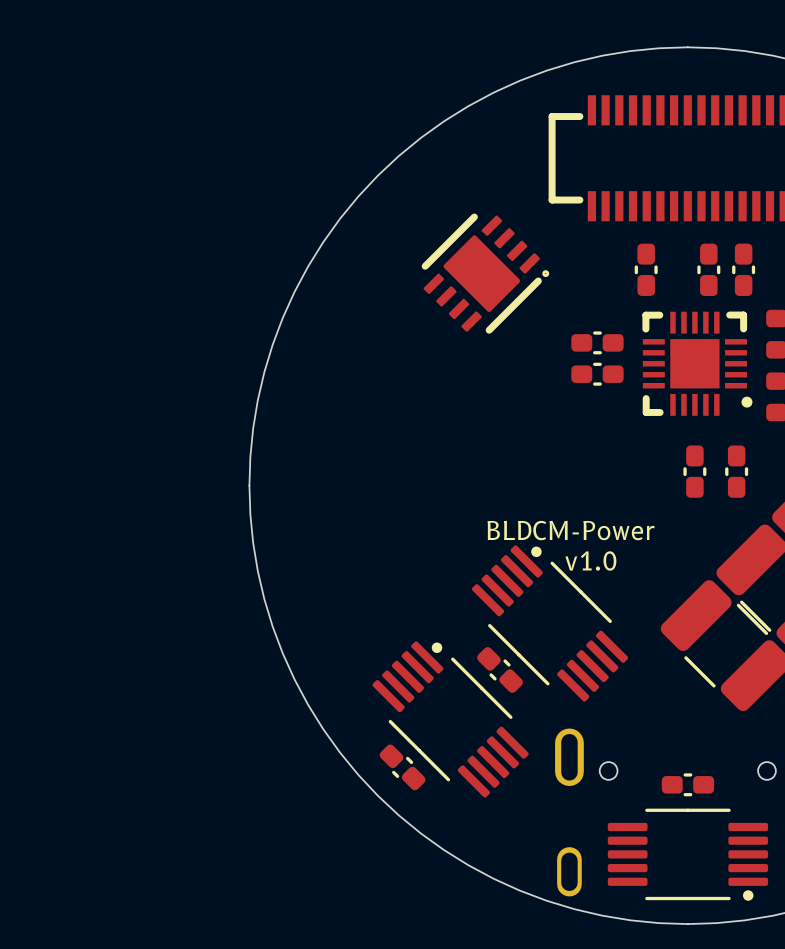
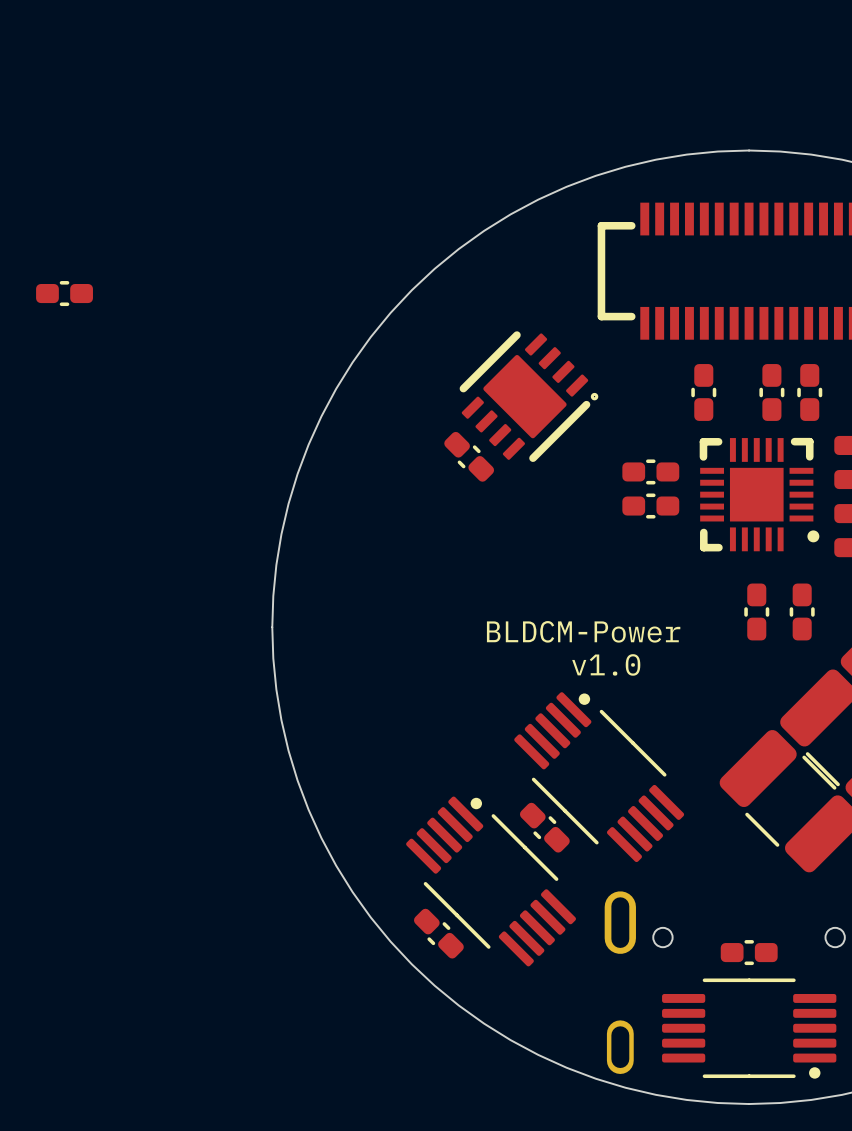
part: none -> (64, 293)
part: none -> (469, 456)
text position: BLDCM-Power (571, 530) -> BLDCM-Power (583, 631)
text position: v1.0 (590, 560) -> v1.0 (606, 664)

